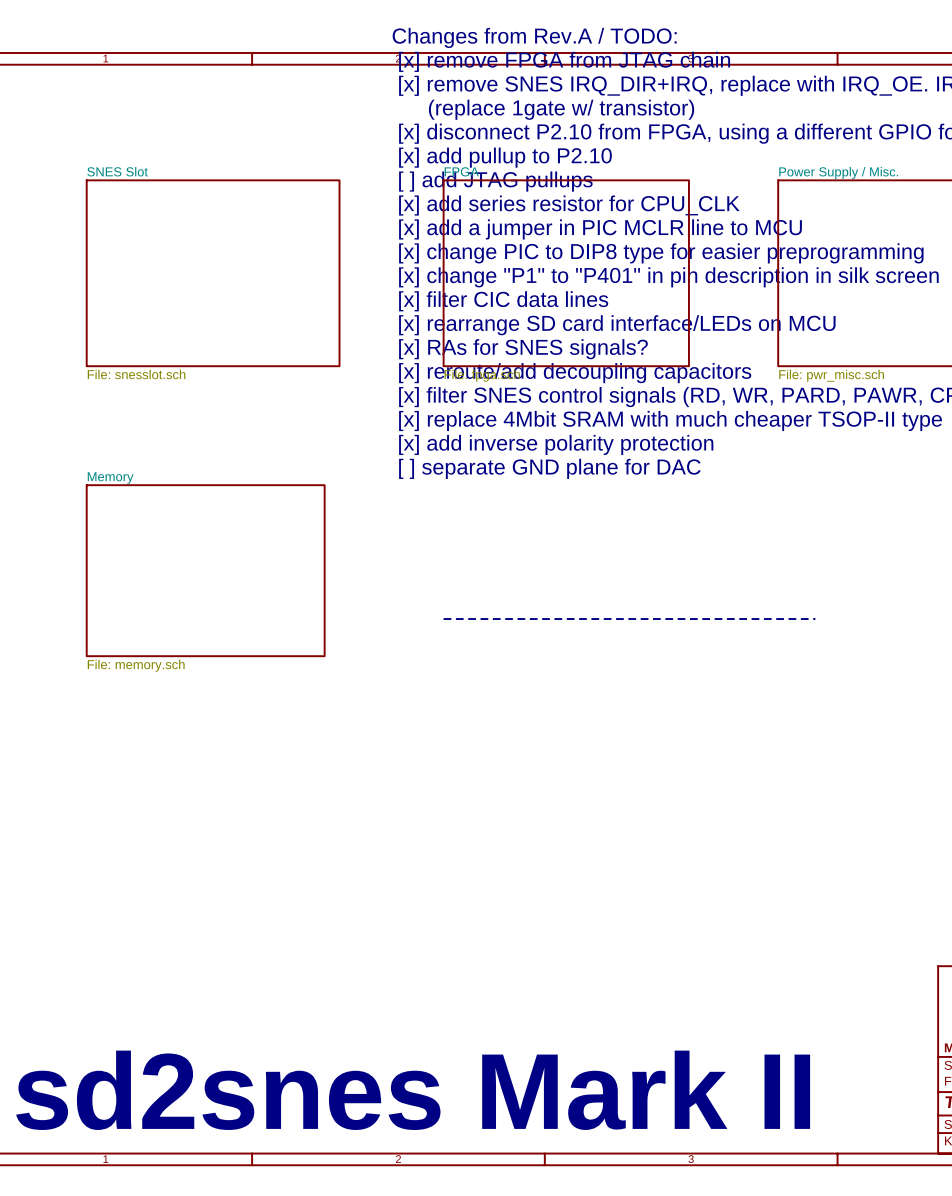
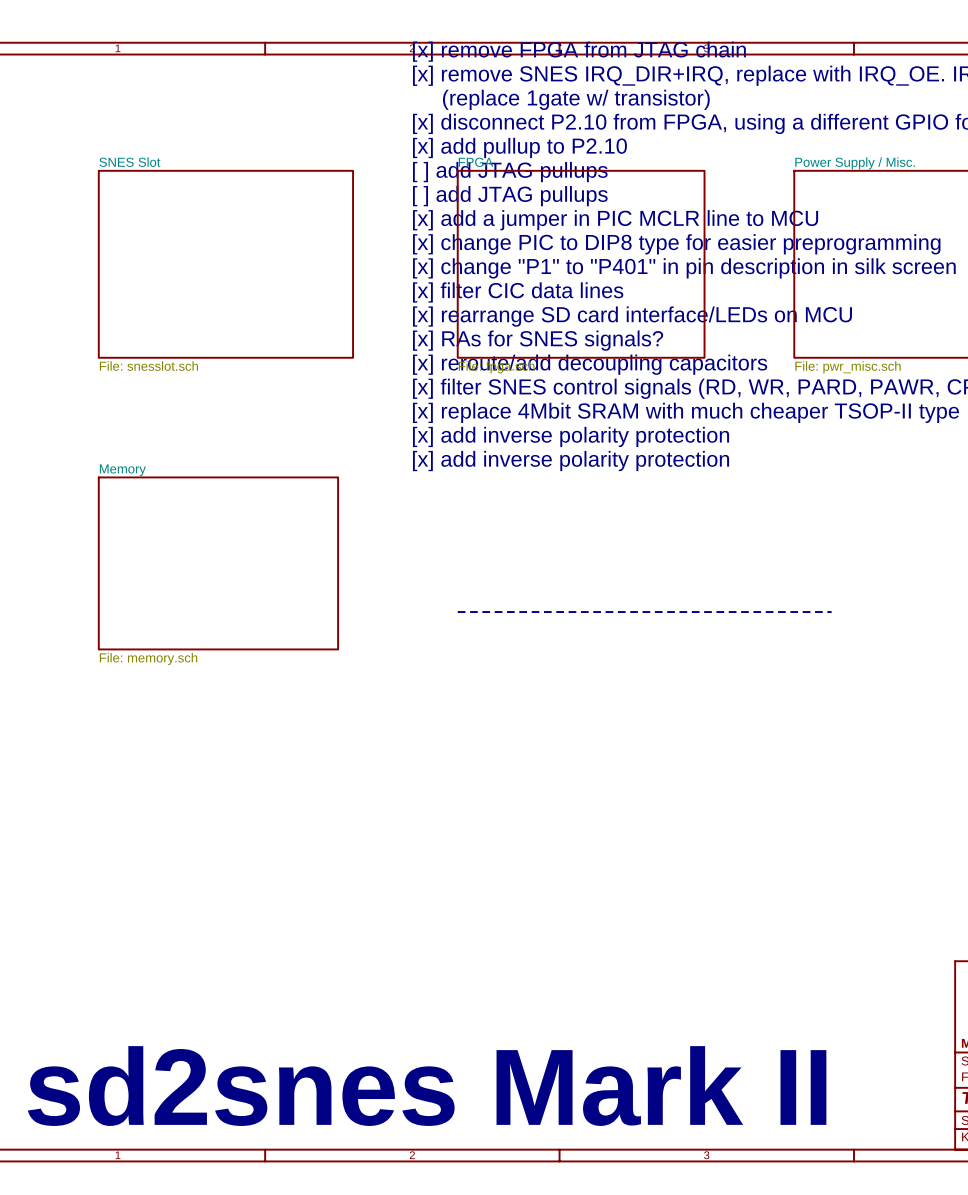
text: Changes from Rev.A / TODO: (534, 37) -> none
text: [x] add series resistor for CPU_CLK (569, 205) -> [ ] add JTAG pullups (510, 196)
text: [ ] separate GND plane for DAC (549, 468) -> [x] add inverse polarity protection (571, 461)

